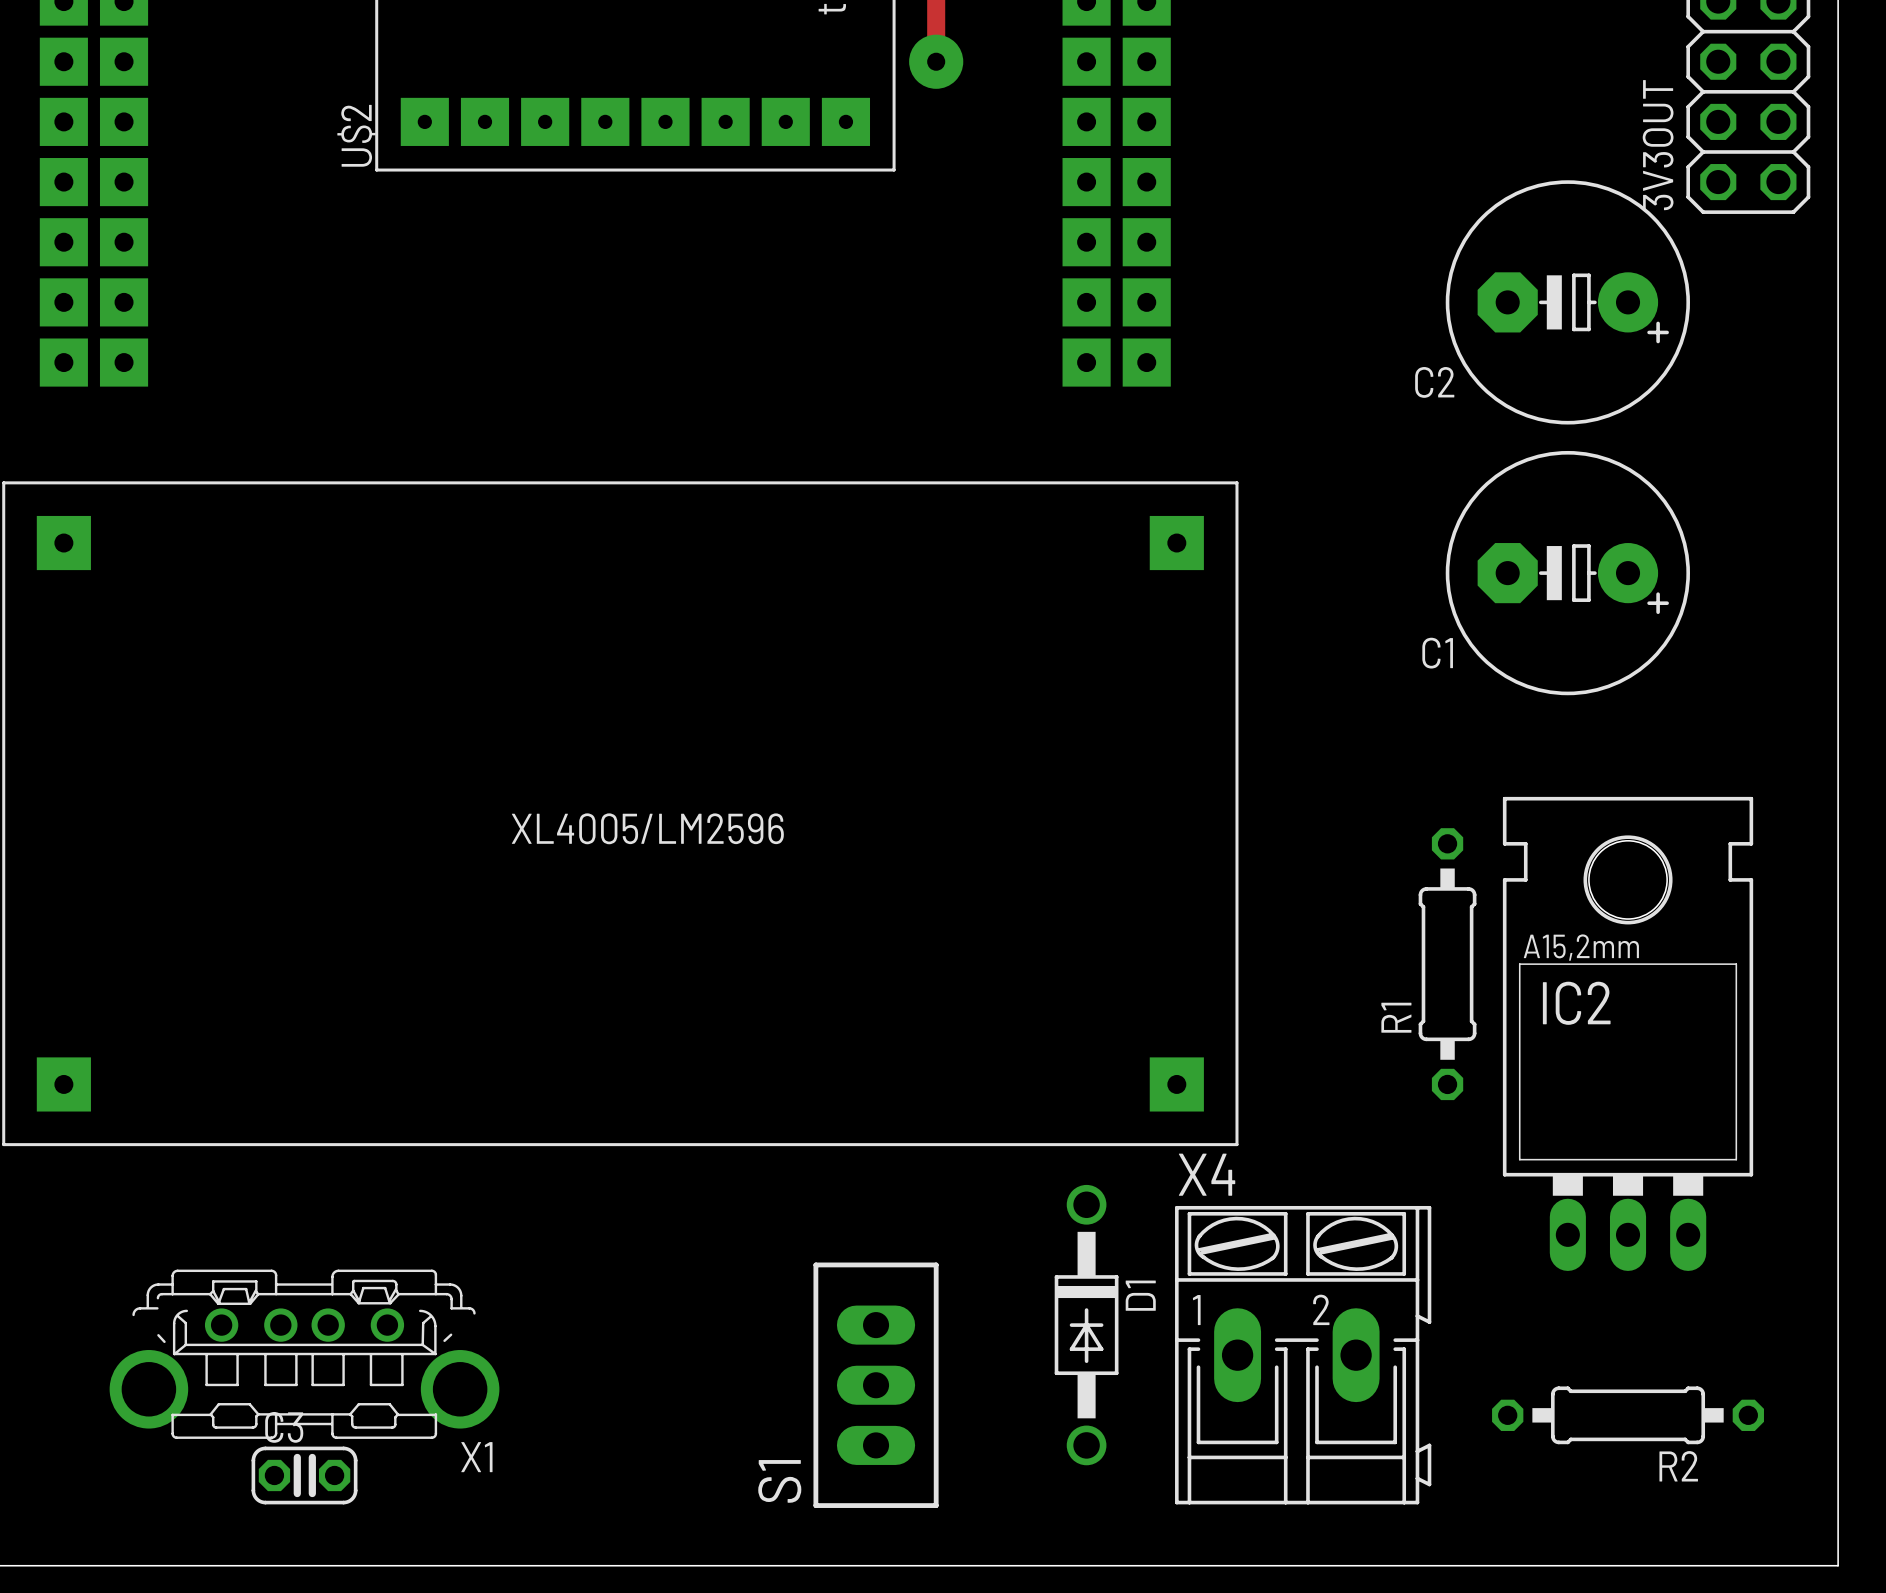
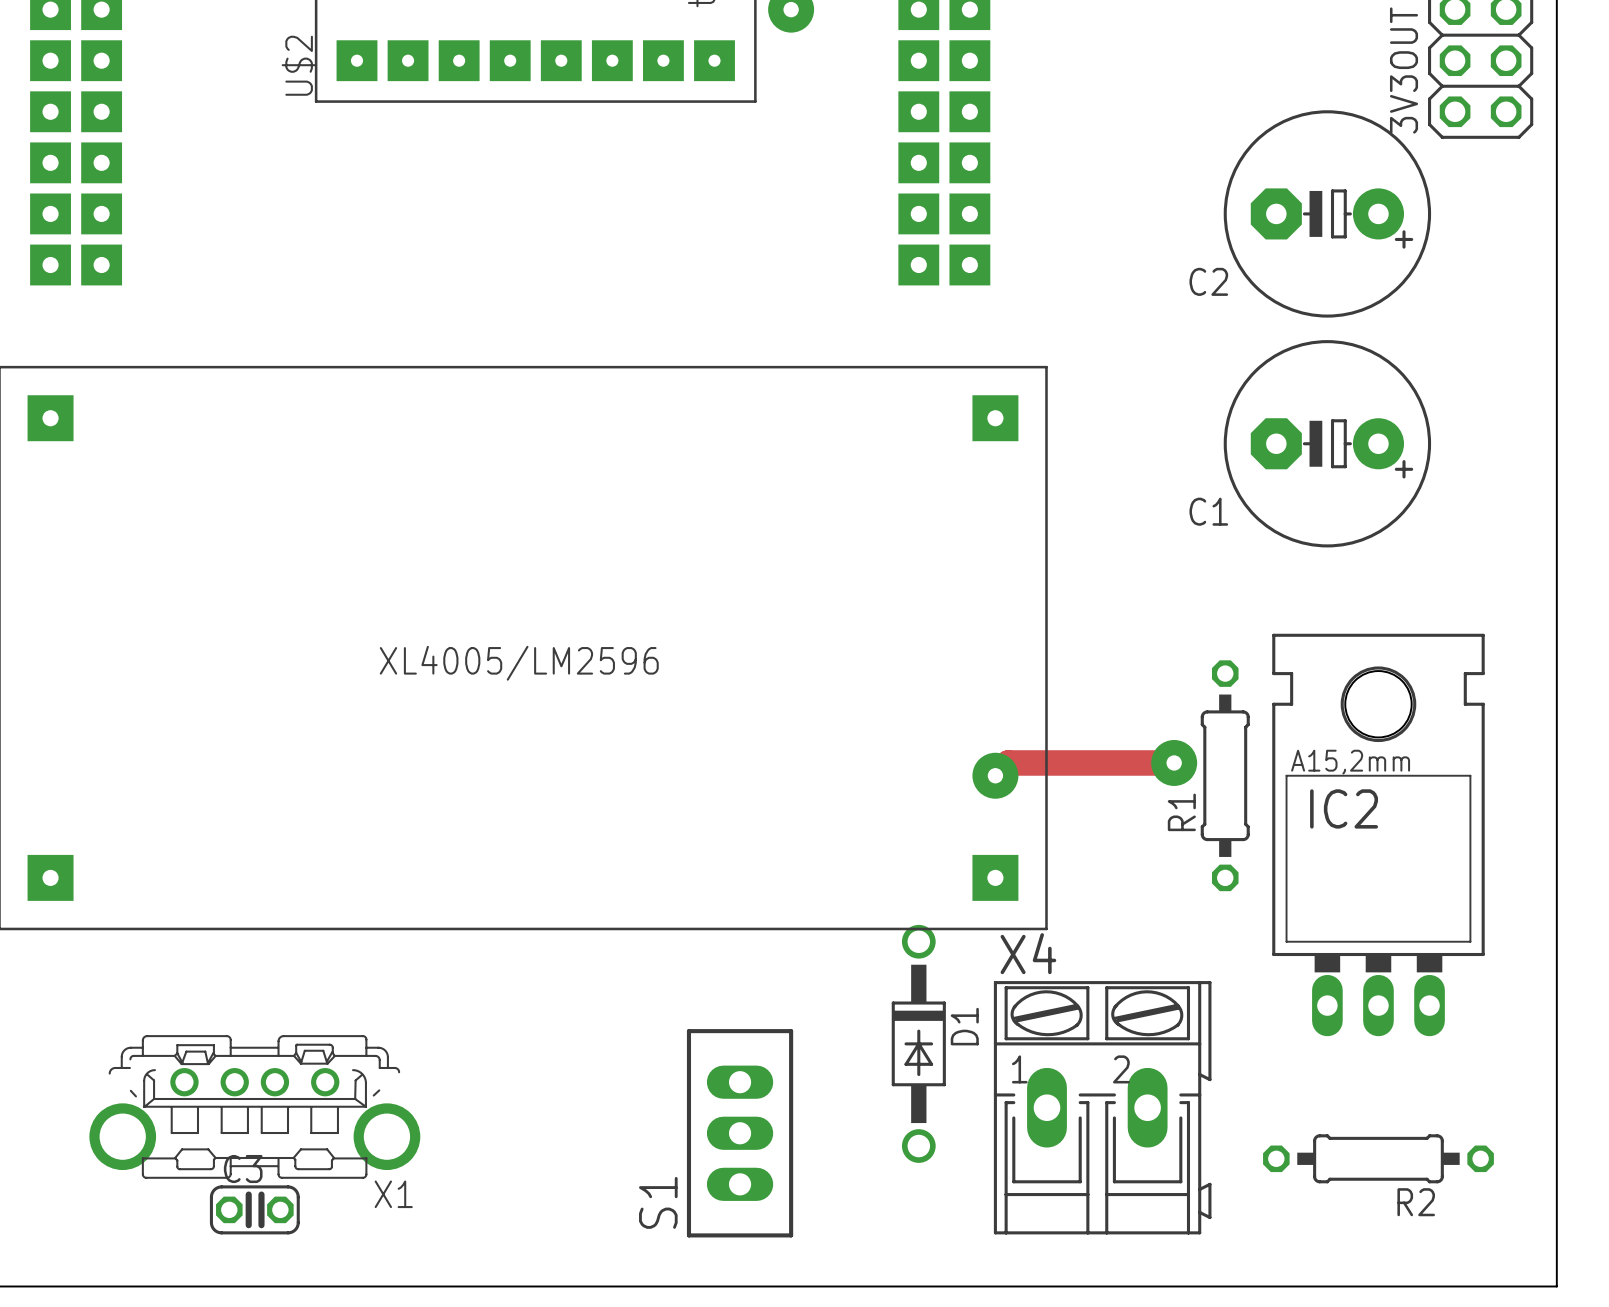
track: none -> (1174, 762) (1008, 762) (995, 775)
via: none -> (1174, 762)
via: none -> (995, 775)
D1 position: (1086, 1325) -> (918, 1043)

